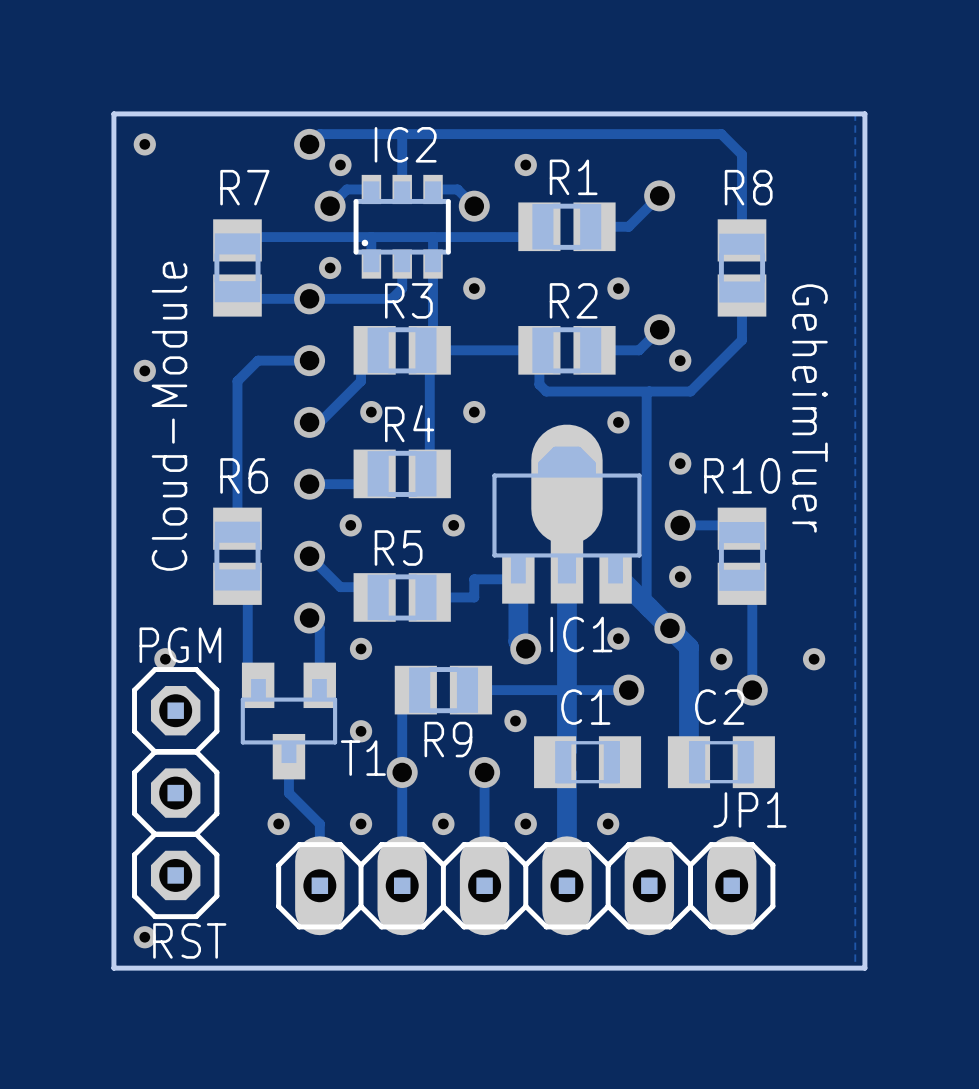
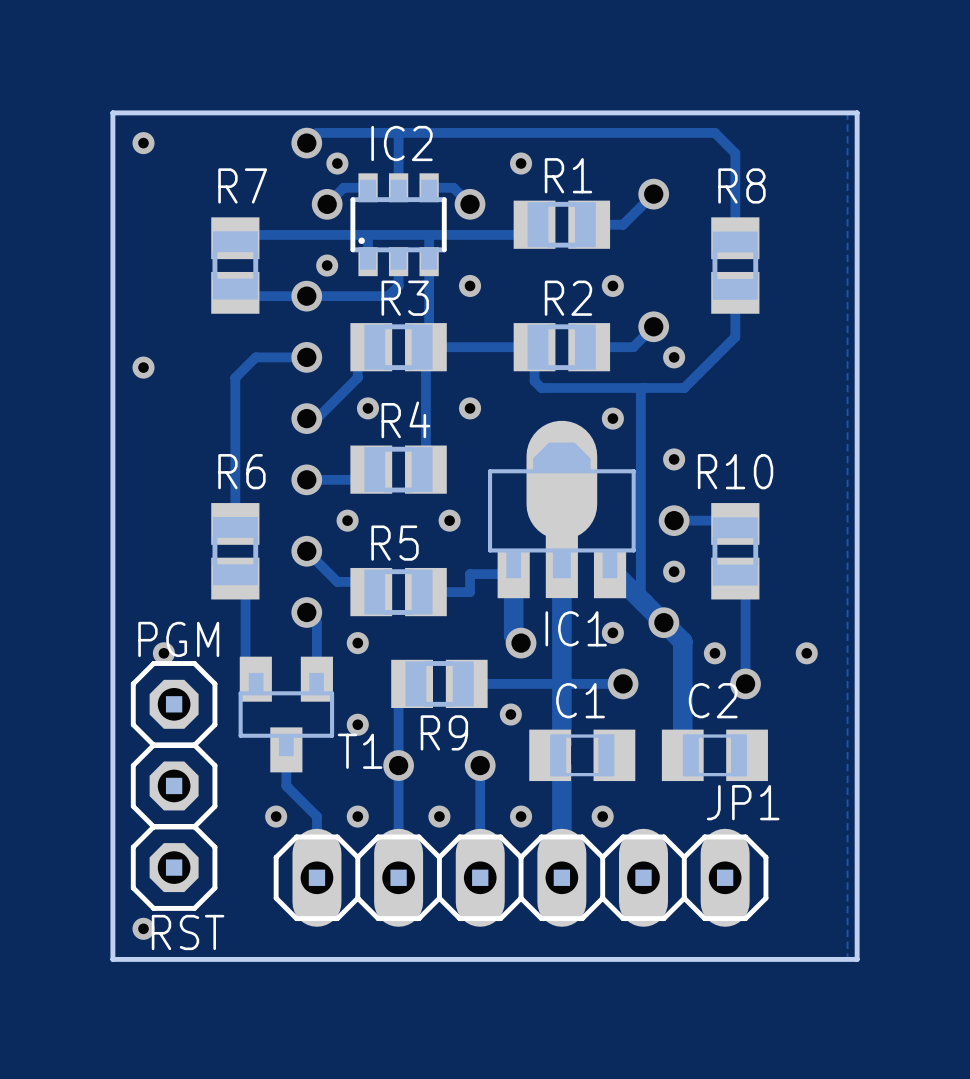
text: GeheimTuer (809, 408) -> none
text: Cloud-Module (169, 416) -> none

